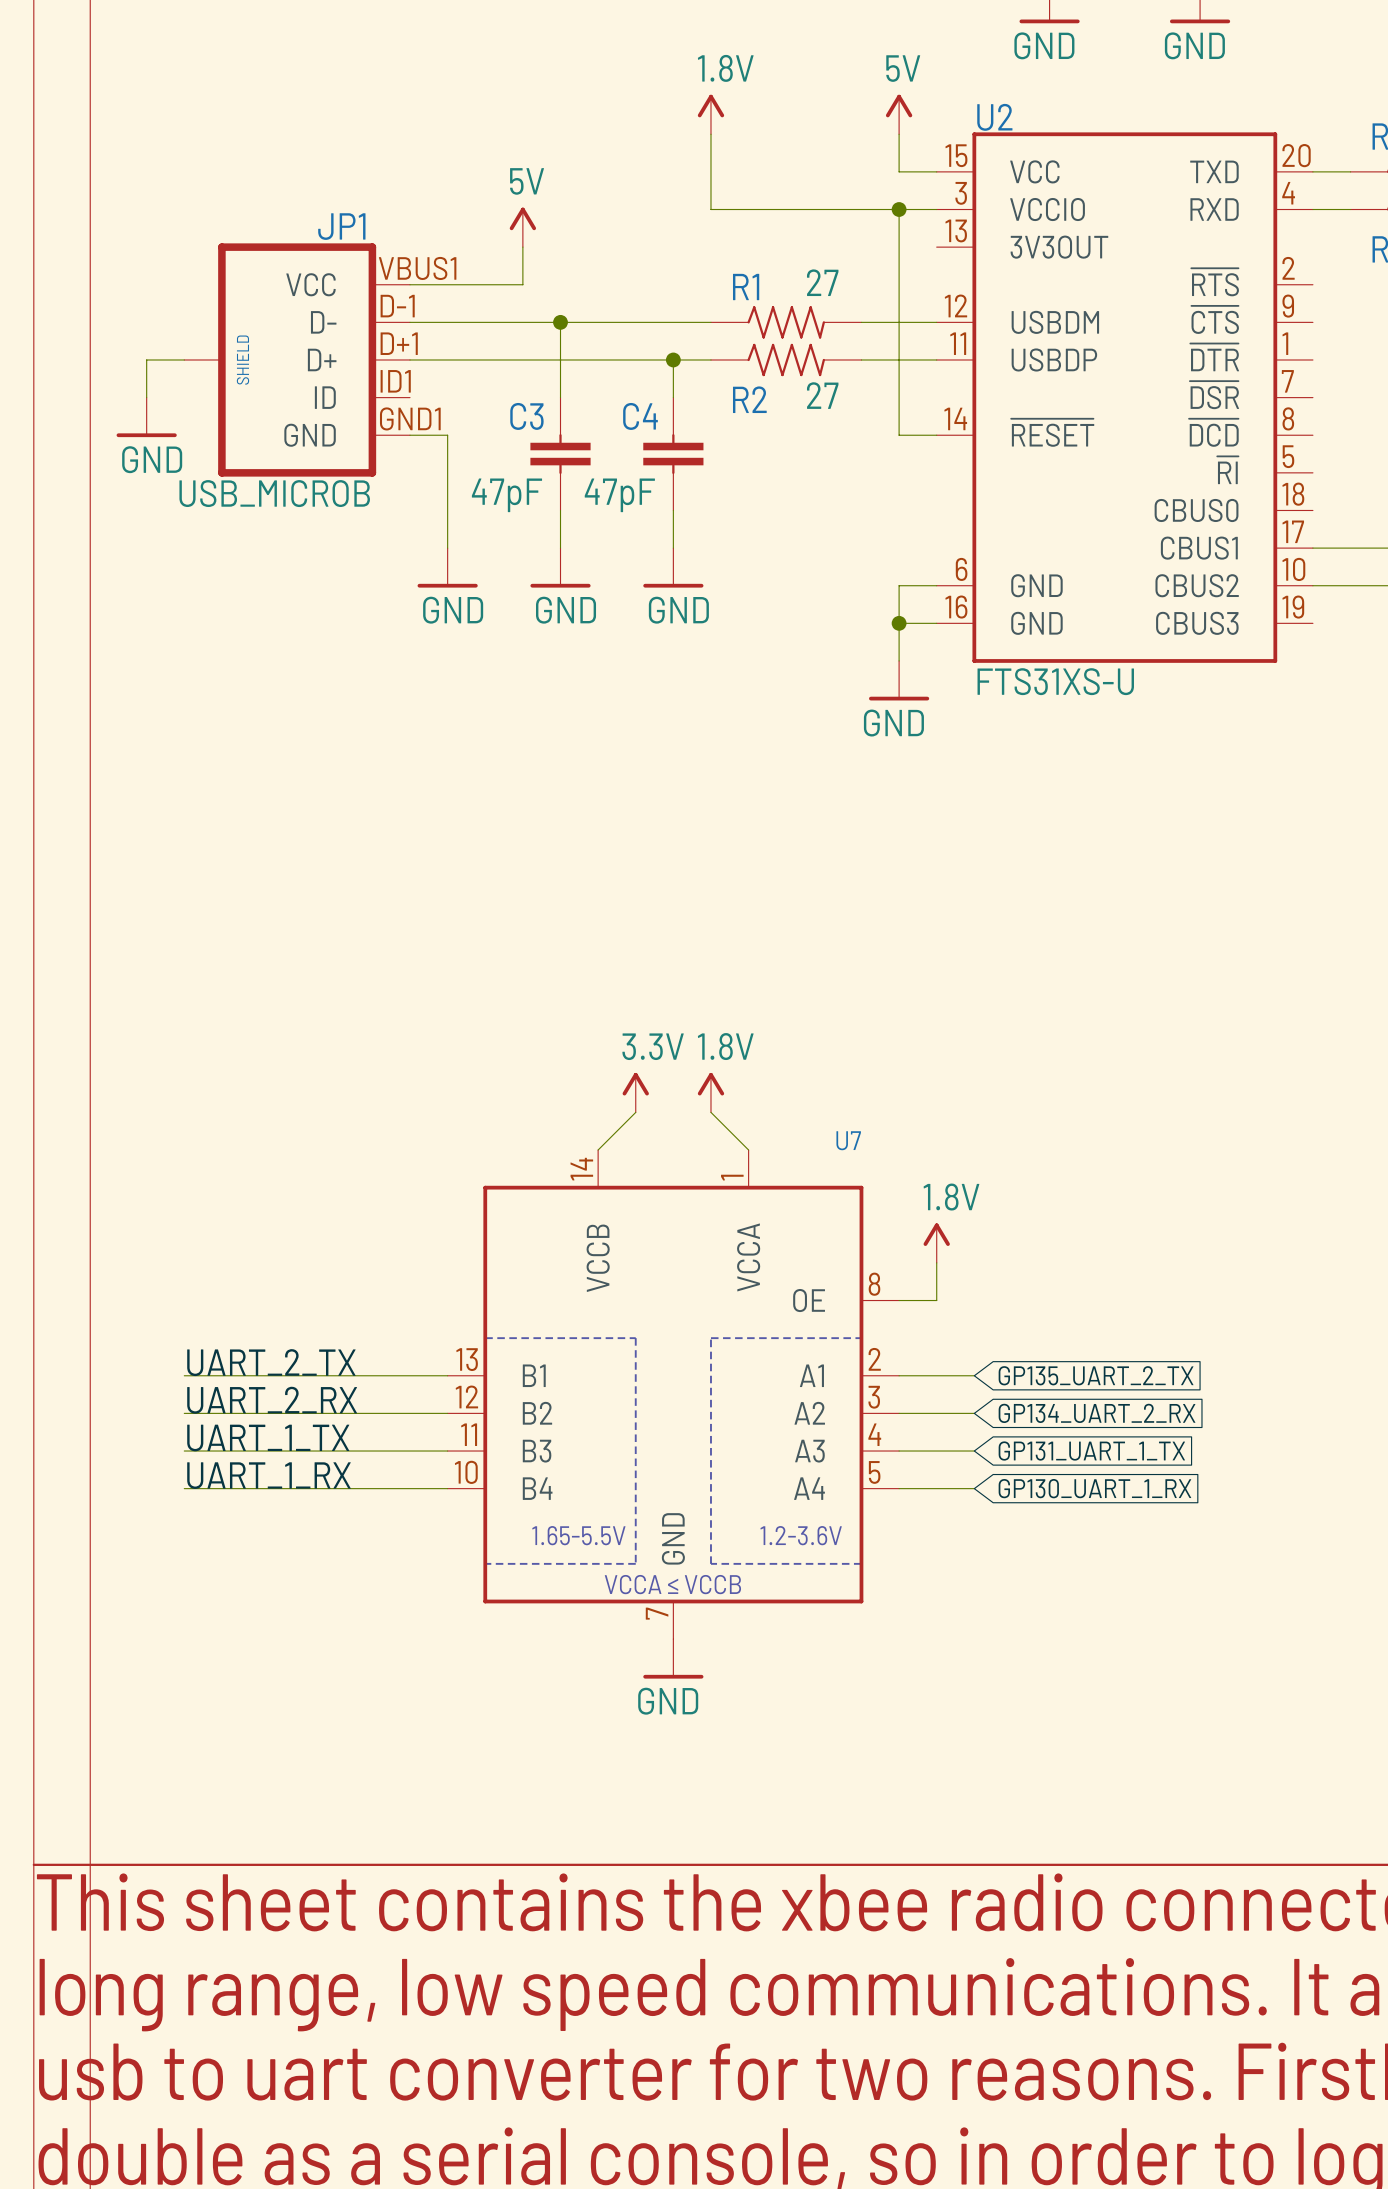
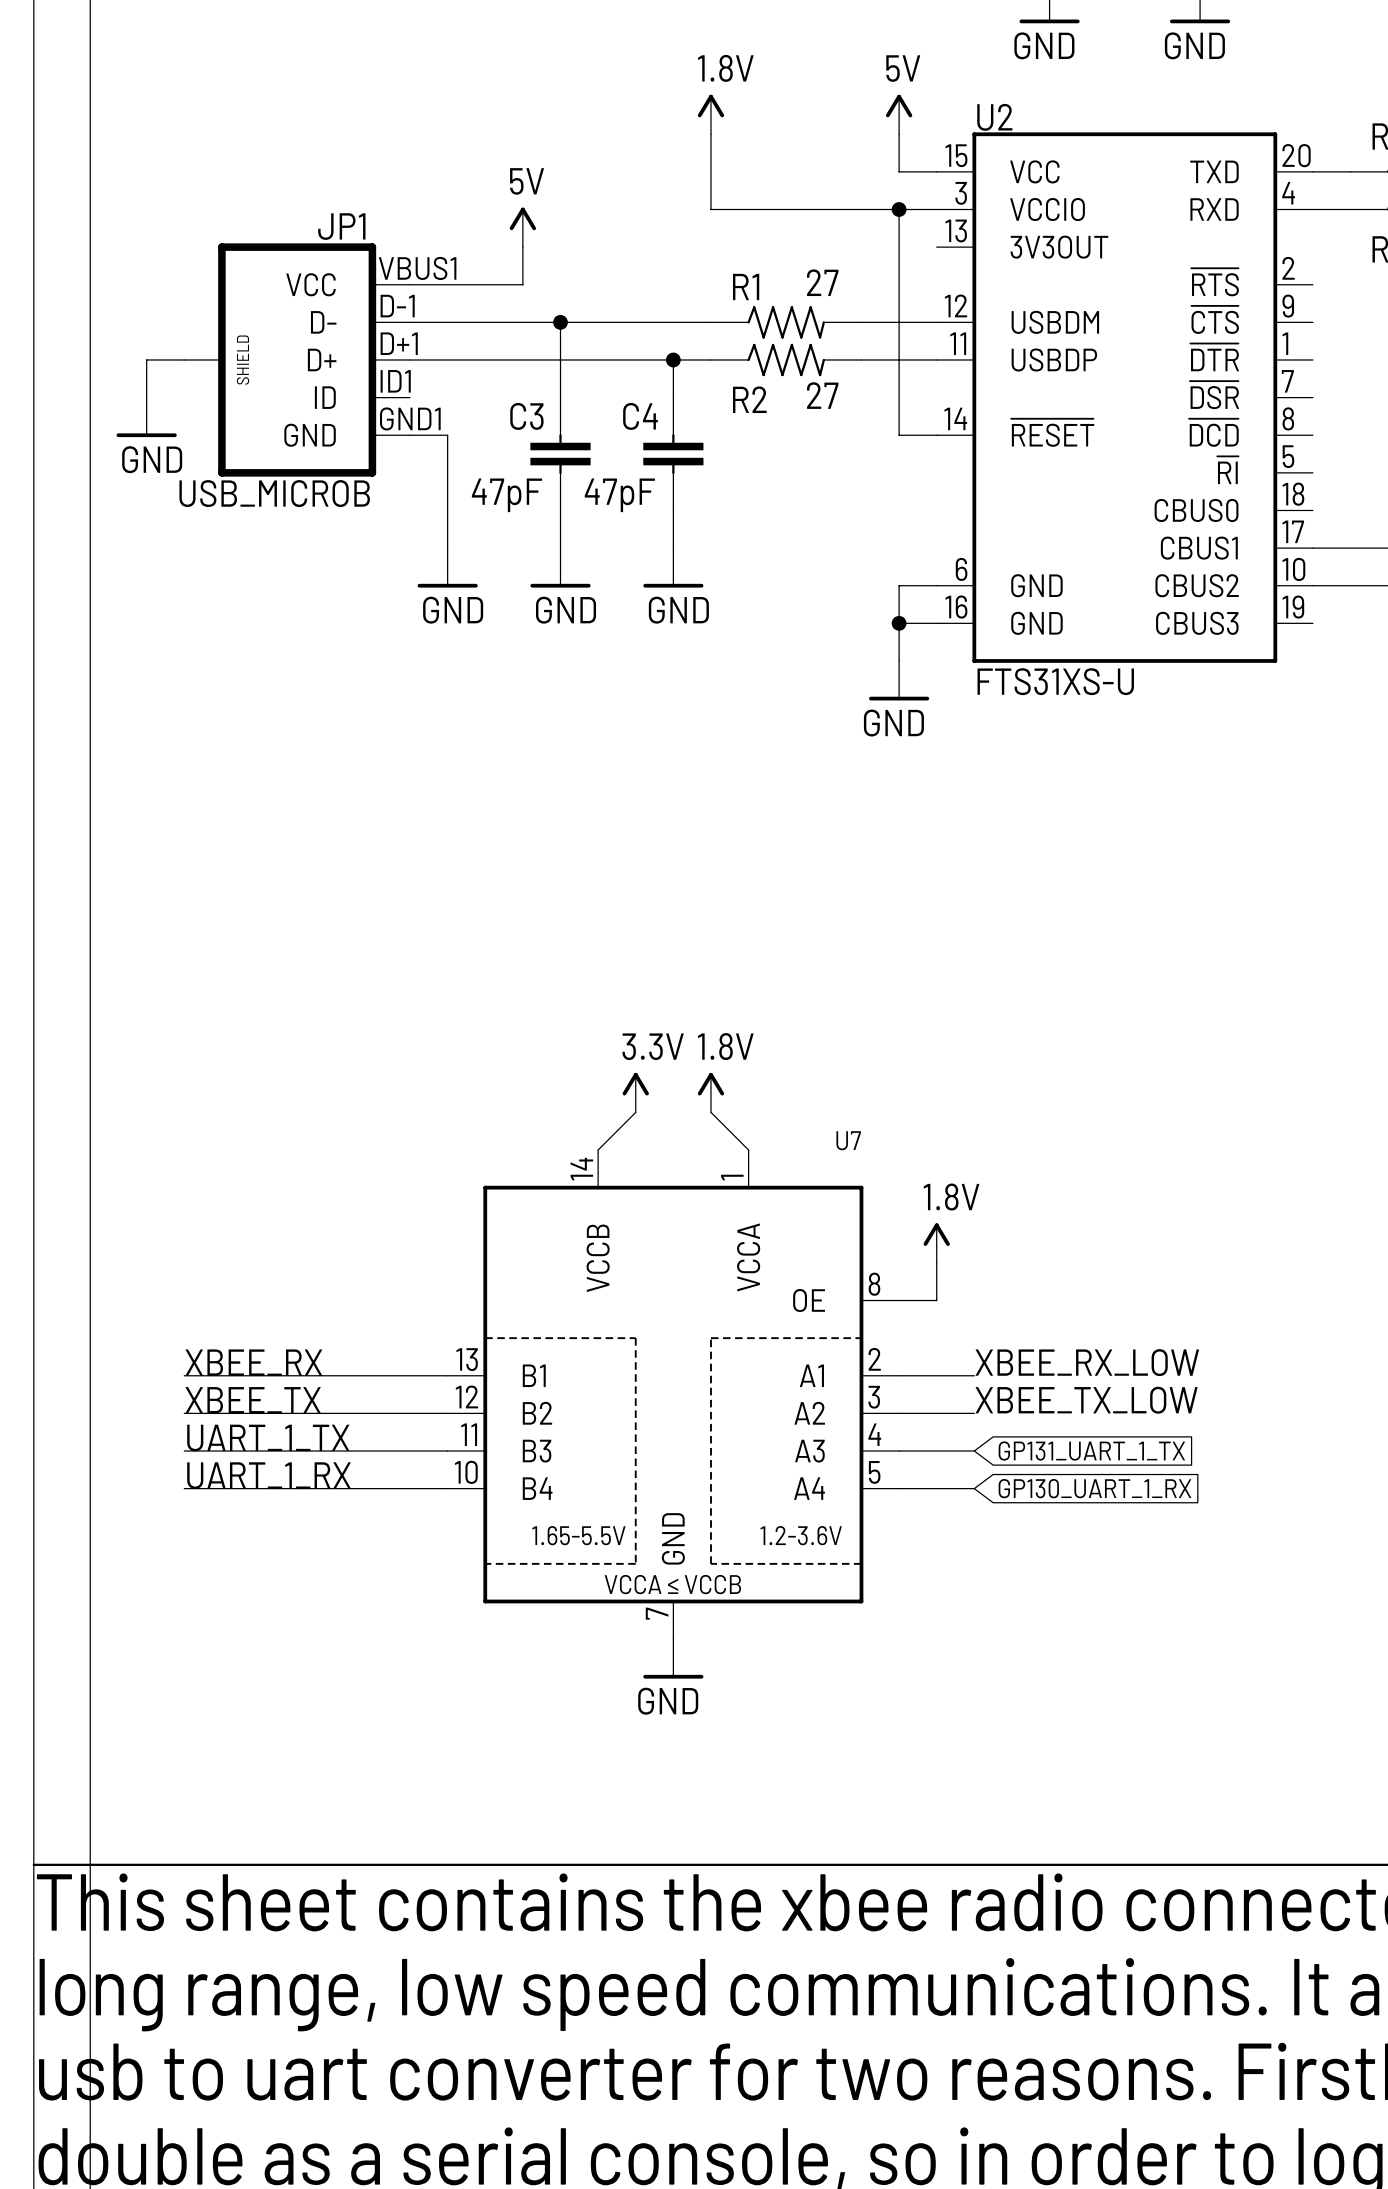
label: UART_2_TX (271, 1362) -> XBEE_RX (253, 1362)
label: none -> XBEE_RX_LOW (1087, 1362)
global label: GP135_UART_2_TX (1096, 1375) -> none
label: UART_2_RX (272, 1400) -> XBEE_TX (253, 1400)
label: none -> XBEE_TX_LOW (1086, 1400)
global label: GP134_UART_2_RX (1097, 1413) -> none

